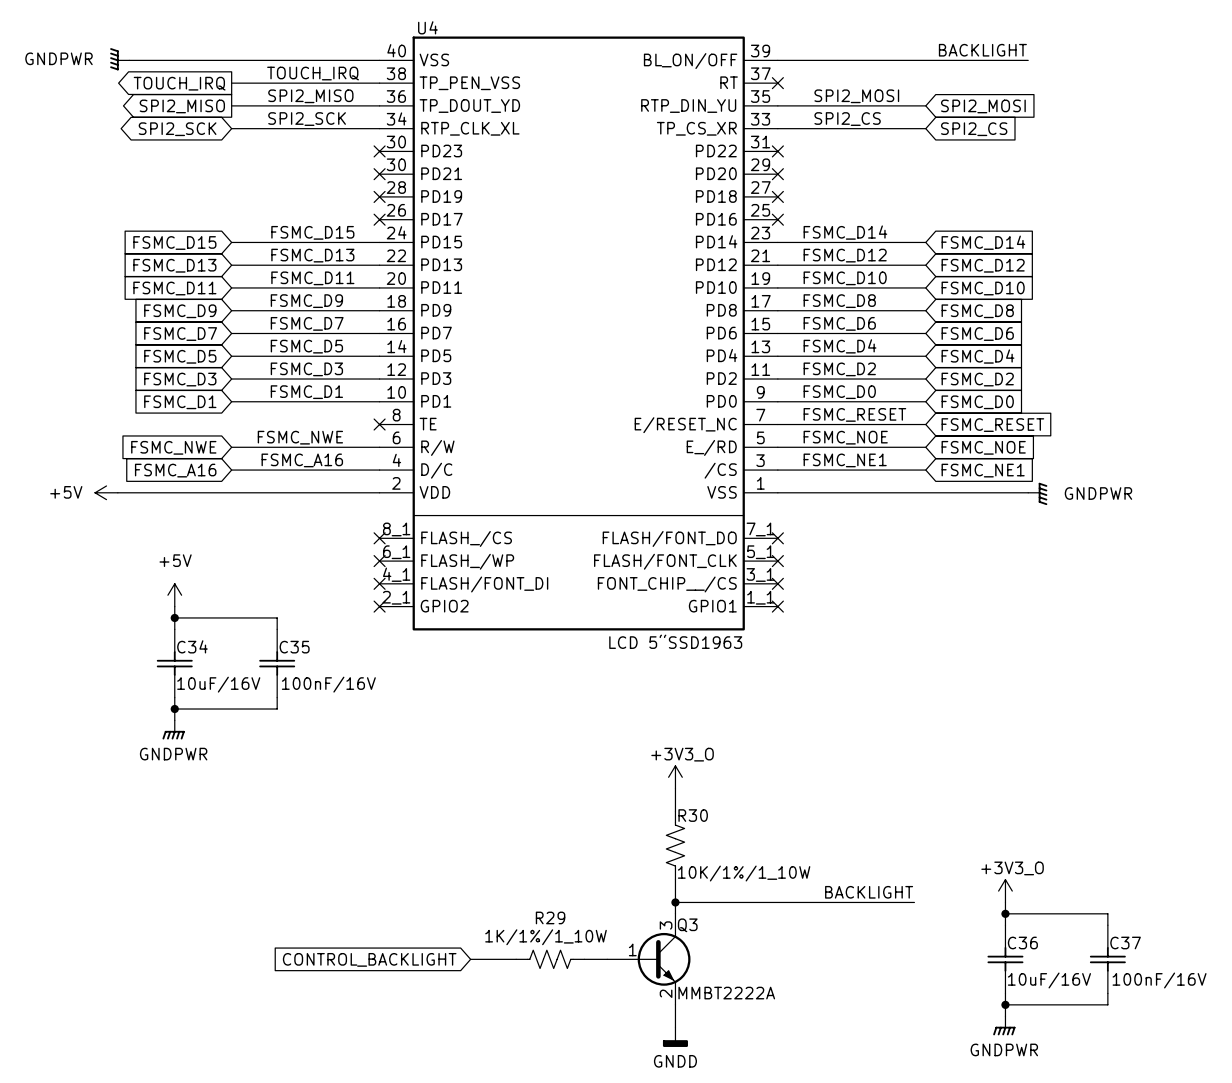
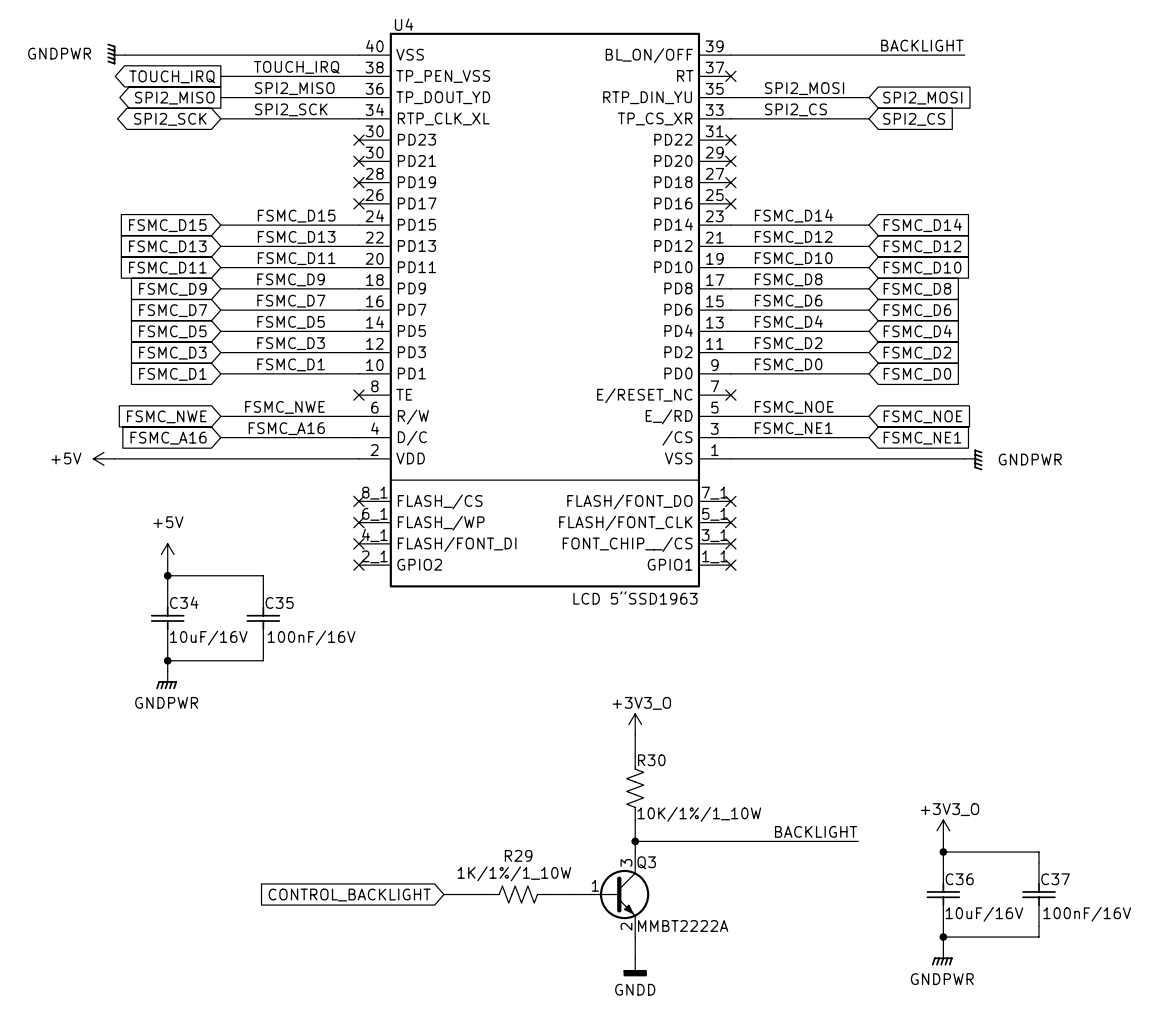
label: FSMC_RESET (854, 414) -> none
wire: (777, 424) (925, 424) -> none
no-connect mark: none -> (730, 395)
global label: FSMC_RESET (992, 425) -> none

